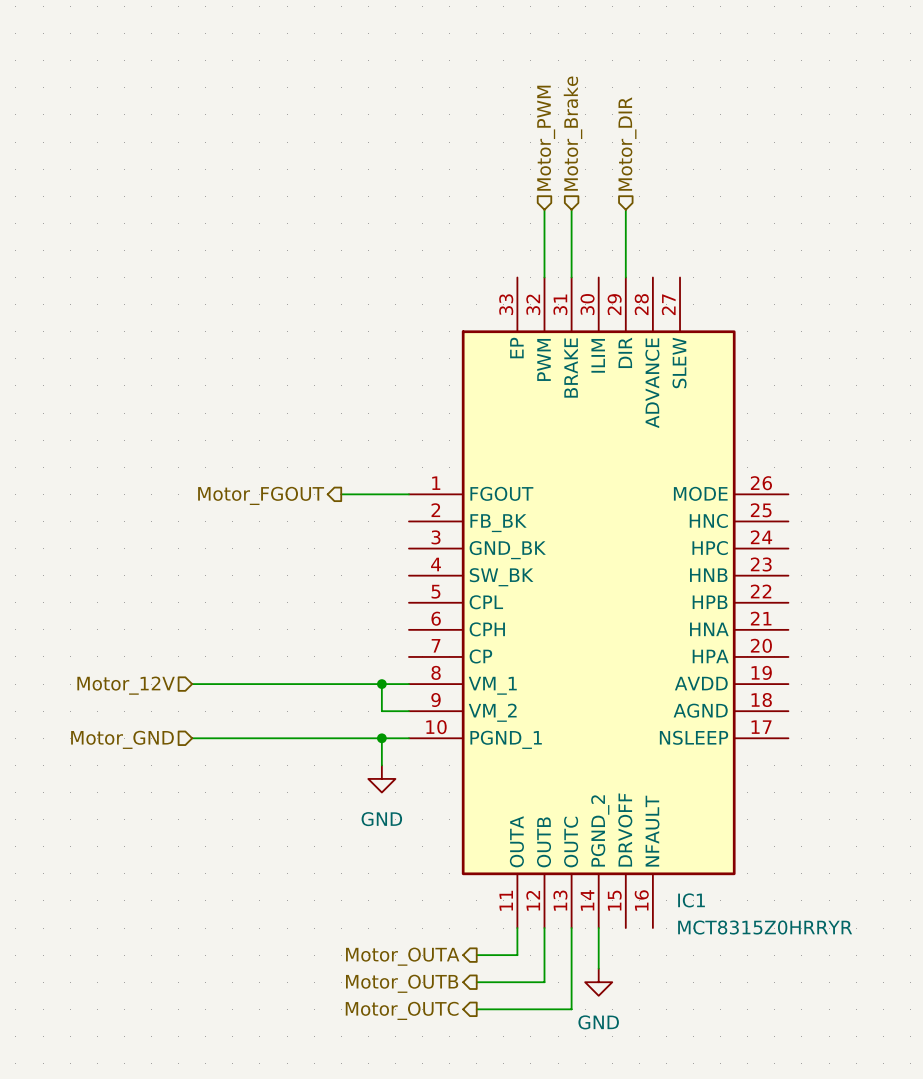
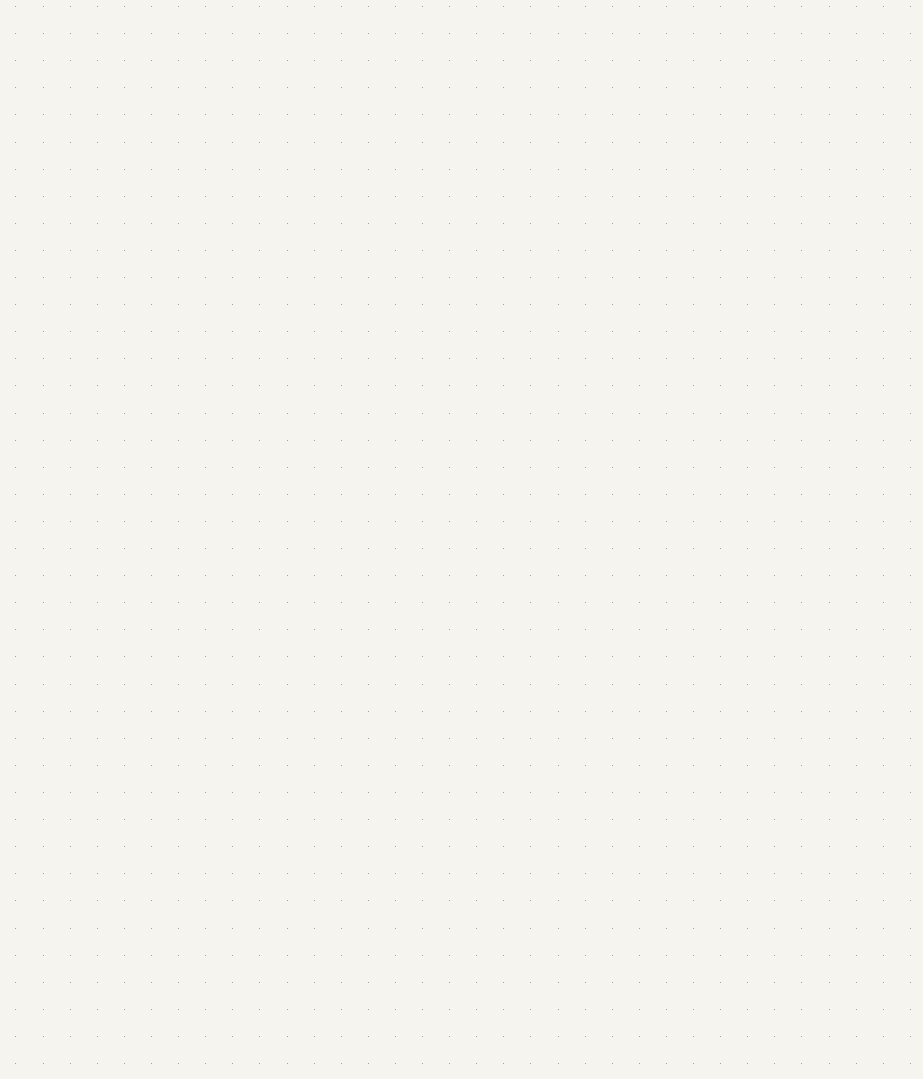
hierarchical label: Motor_Brake (573, 133) -> none
hierarchical label: Motor_PWM (546, 138) -> none
hierarchical label: Motor_DIR (627, 144) -> none
wire: (544, 209) (544, 277) -> none
wire: (571, 209) (571, 277) -> none
wire: (625, 209) (625, 277) -> none
wire: (341, 494) (408, 494) -> none
hierarchical label: Motor_FGOUT (261, 495) -> none
IC1: MCT8315Z0HRRYR (598, 602) -> none
wire: (192, 684) (408, 684) -> none
wire: (381, 684) (381, 711) (408, 711) -> none
junction: (381, 684) -> none
hierarchical label: Motor_12V (126, 685) -> none
wire: (192, 738) (408, 738) -> none
wire: (381, 738) (381, 765) -> none
junction: (381, 738) -> none
hierarchical label: Motor_GND (122, 739) -> none
power symbol: GND (381, 778) -> none
wire: (517, 928) (517, 955) (476, 955) -> none
wire: (544, 928) (544, 982) (476, 982) -> none
wire: (571, 928) (571, 1009) (476, 1009) -> none
wire: (598, 928) (598, 968) -> none
hierarchical label: Motor_OUTA (402, 956) -> none
power symbol: GND (598, 982) -> none
hierarchical label: Motor_OUTB (402, 983) -> none
hierarchical label: Motor_OUTC (402, 1010) -> none

